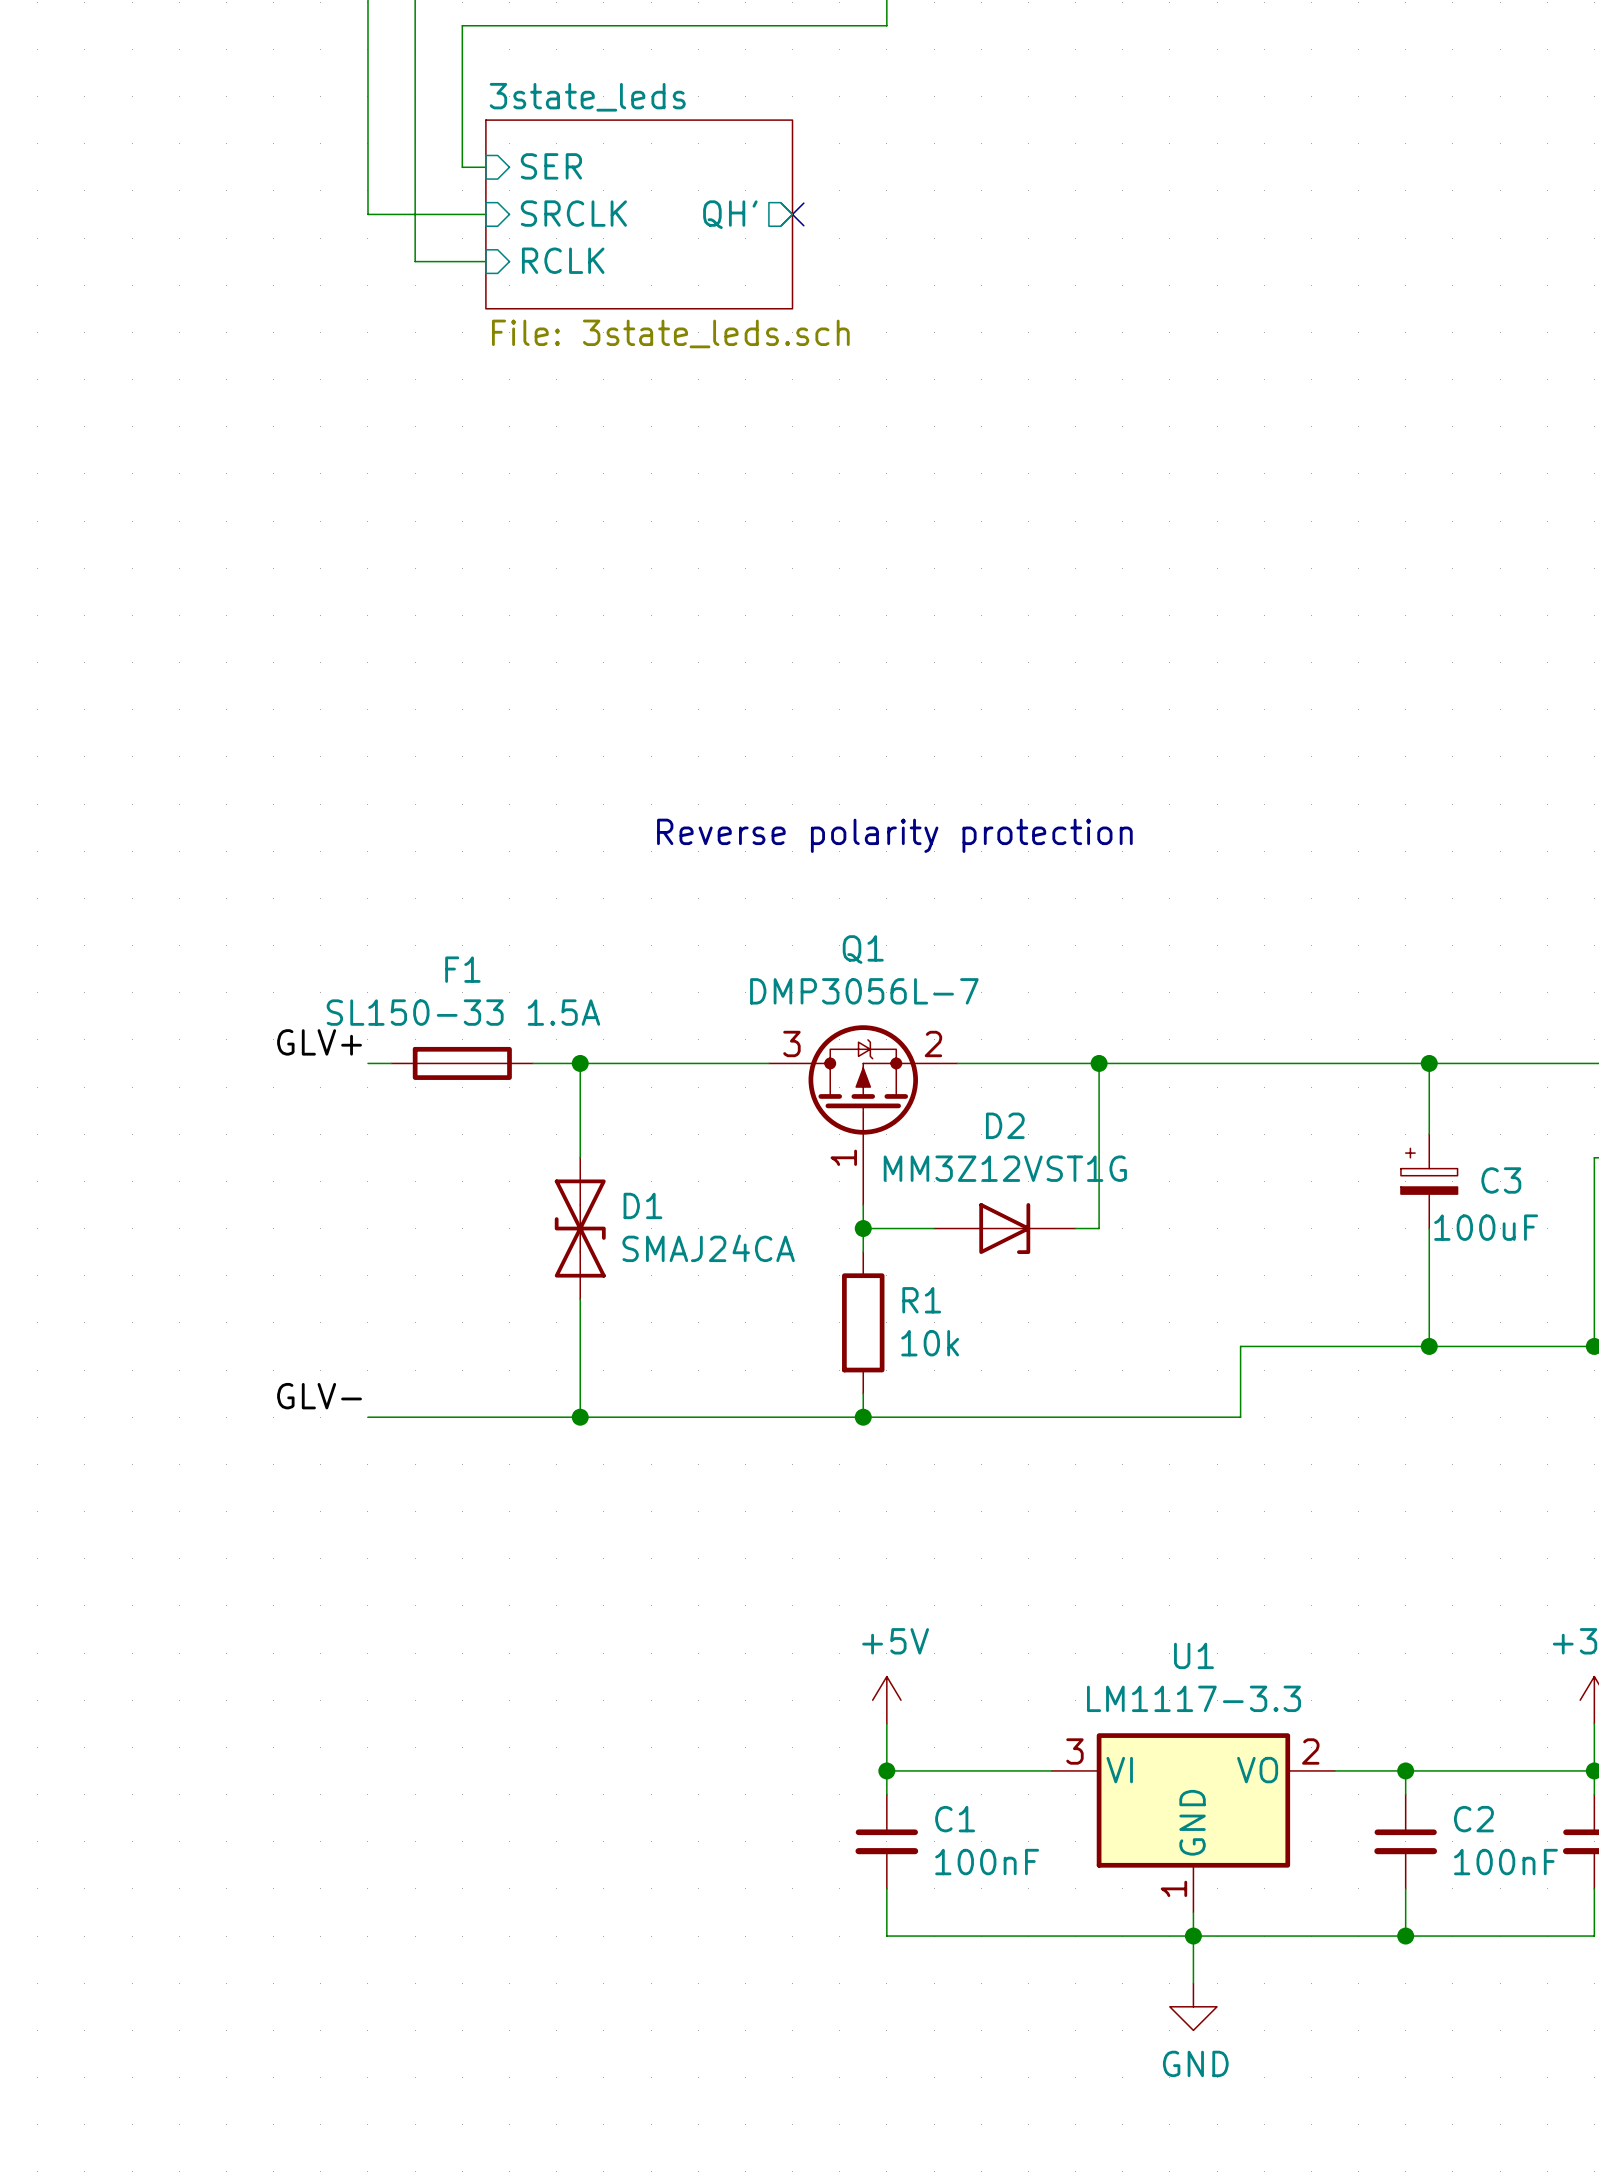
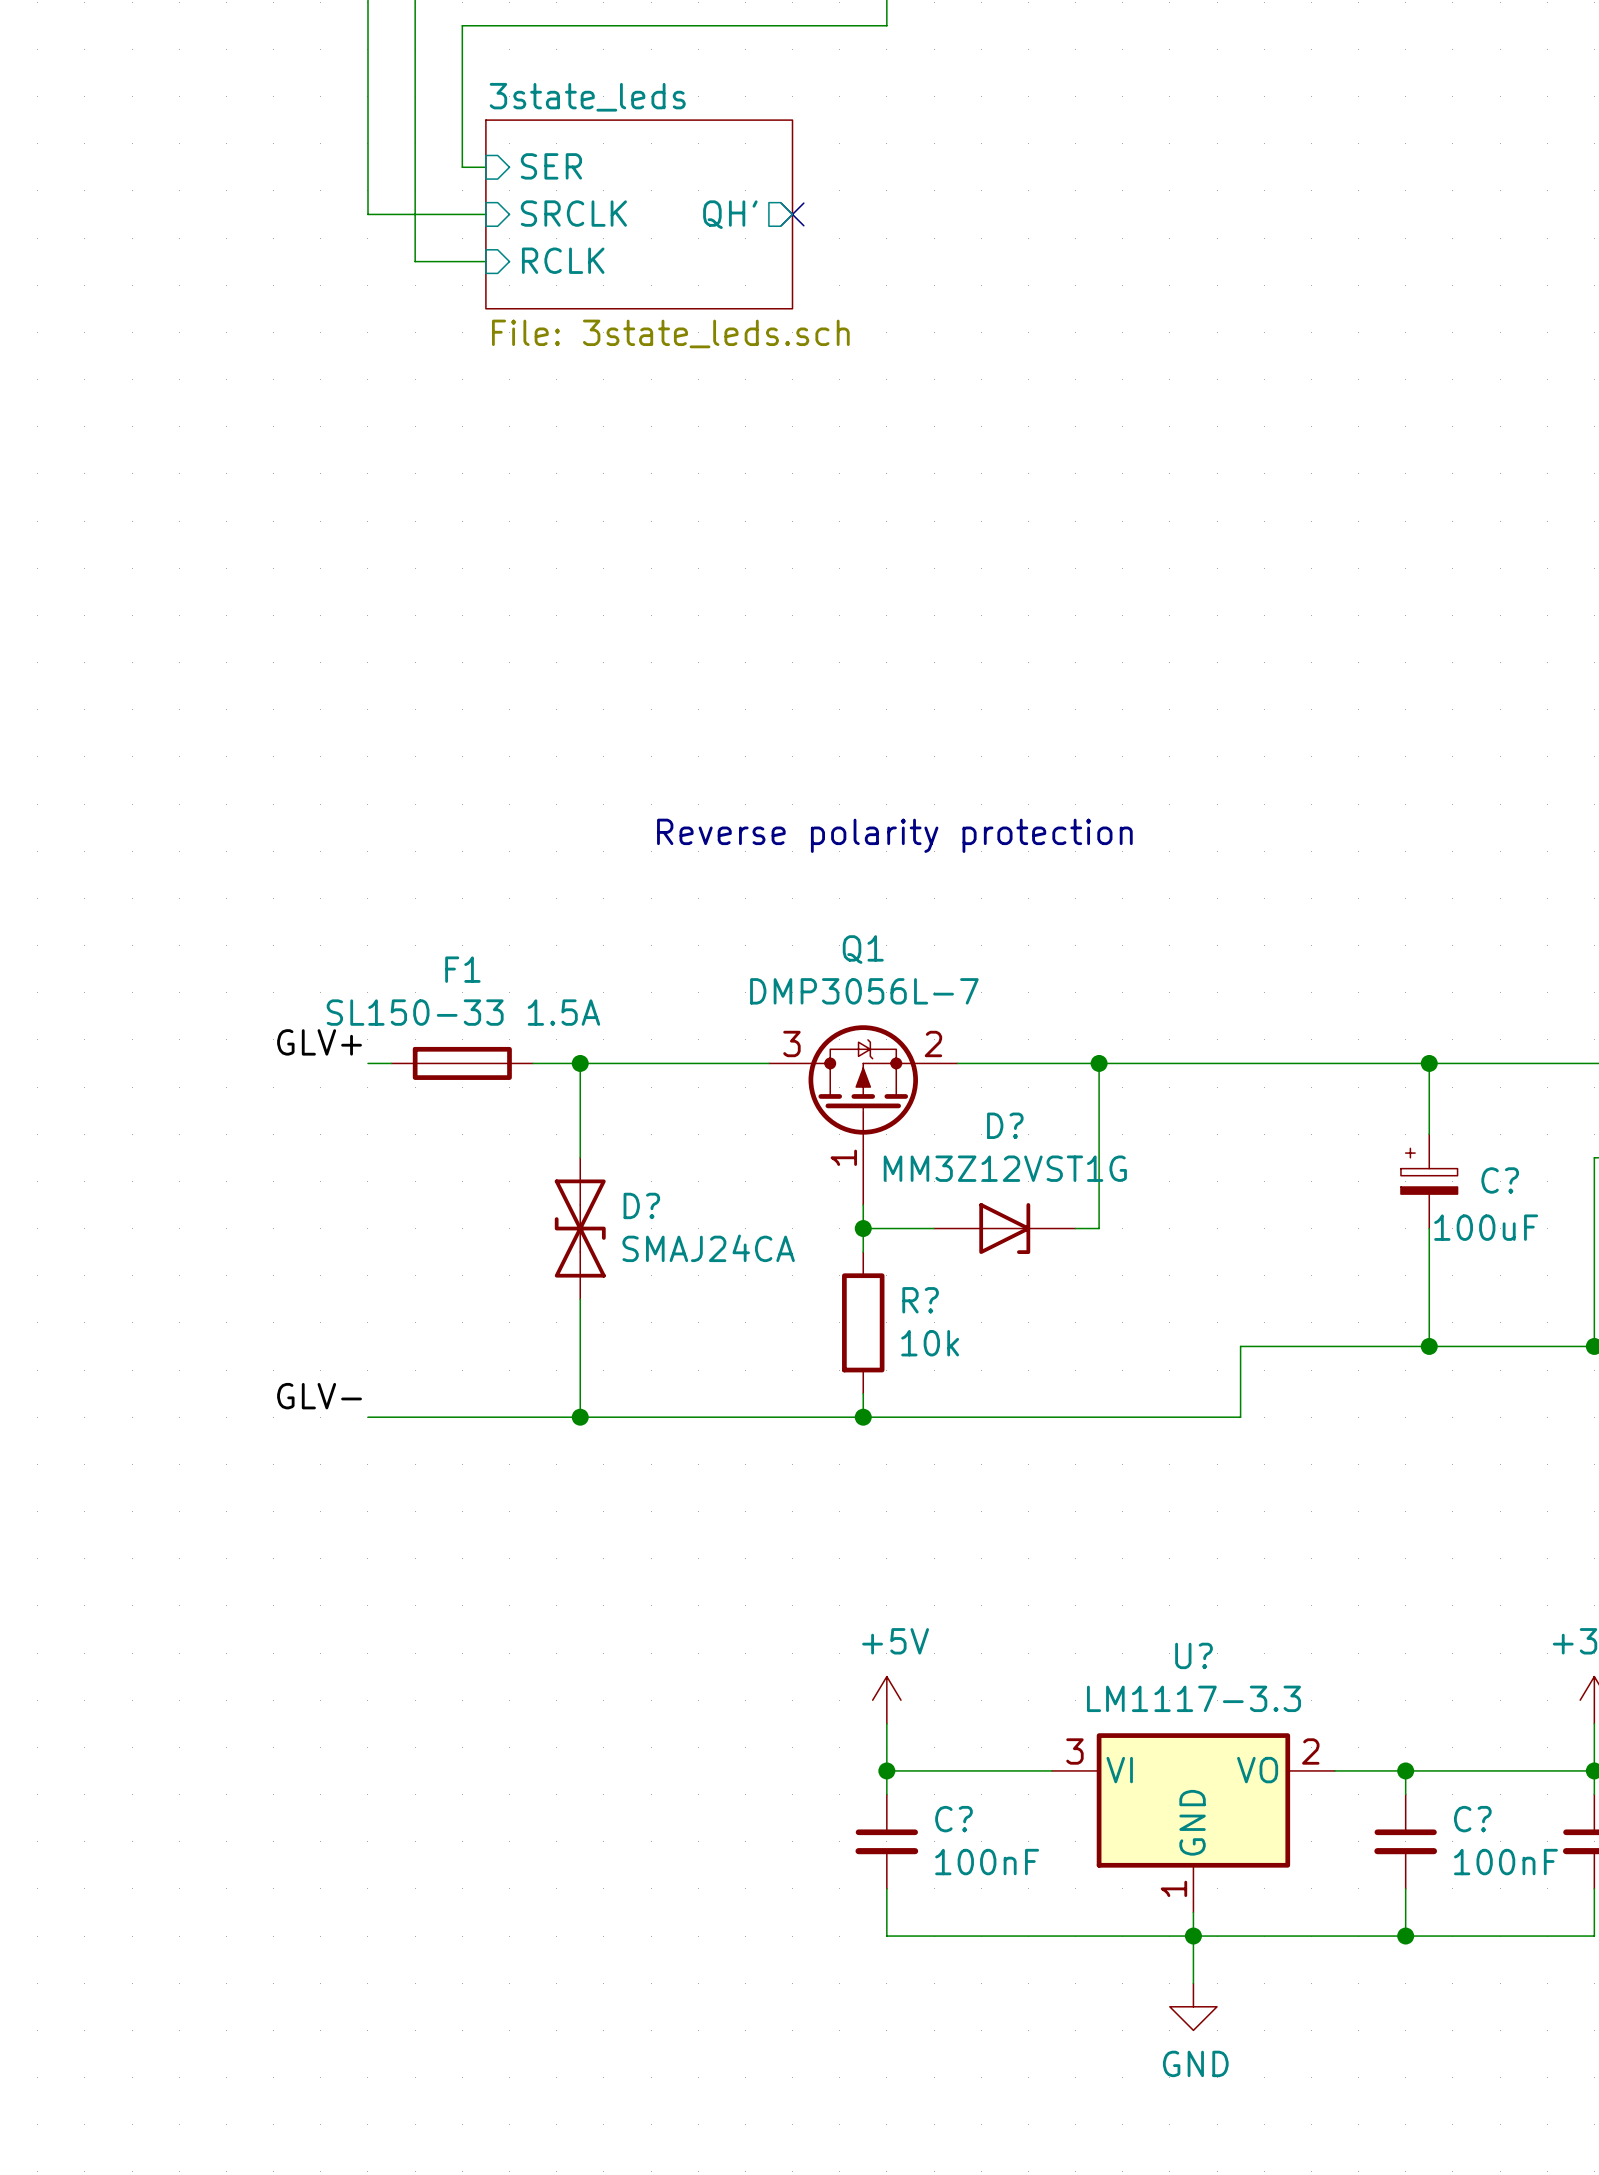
D2 name: D2 (1005, 1125) -> D? (1005, 1125)
C3 name: C3 (1501, 1180) -> C? (1500, 1180)
D1 name: D1 (642, 1205) -> D? (641, 1205)
R1 name: R1 (921, 1300) -> R? (920, 1300)
U1 name: U1 (1193, 1655) -> U? (1193, 1655)
C1 name: C1 (955, 1819) -> C? (953, 1819)
C2 name: C2 (1473, 1819) -> C? (1472, 1819)

